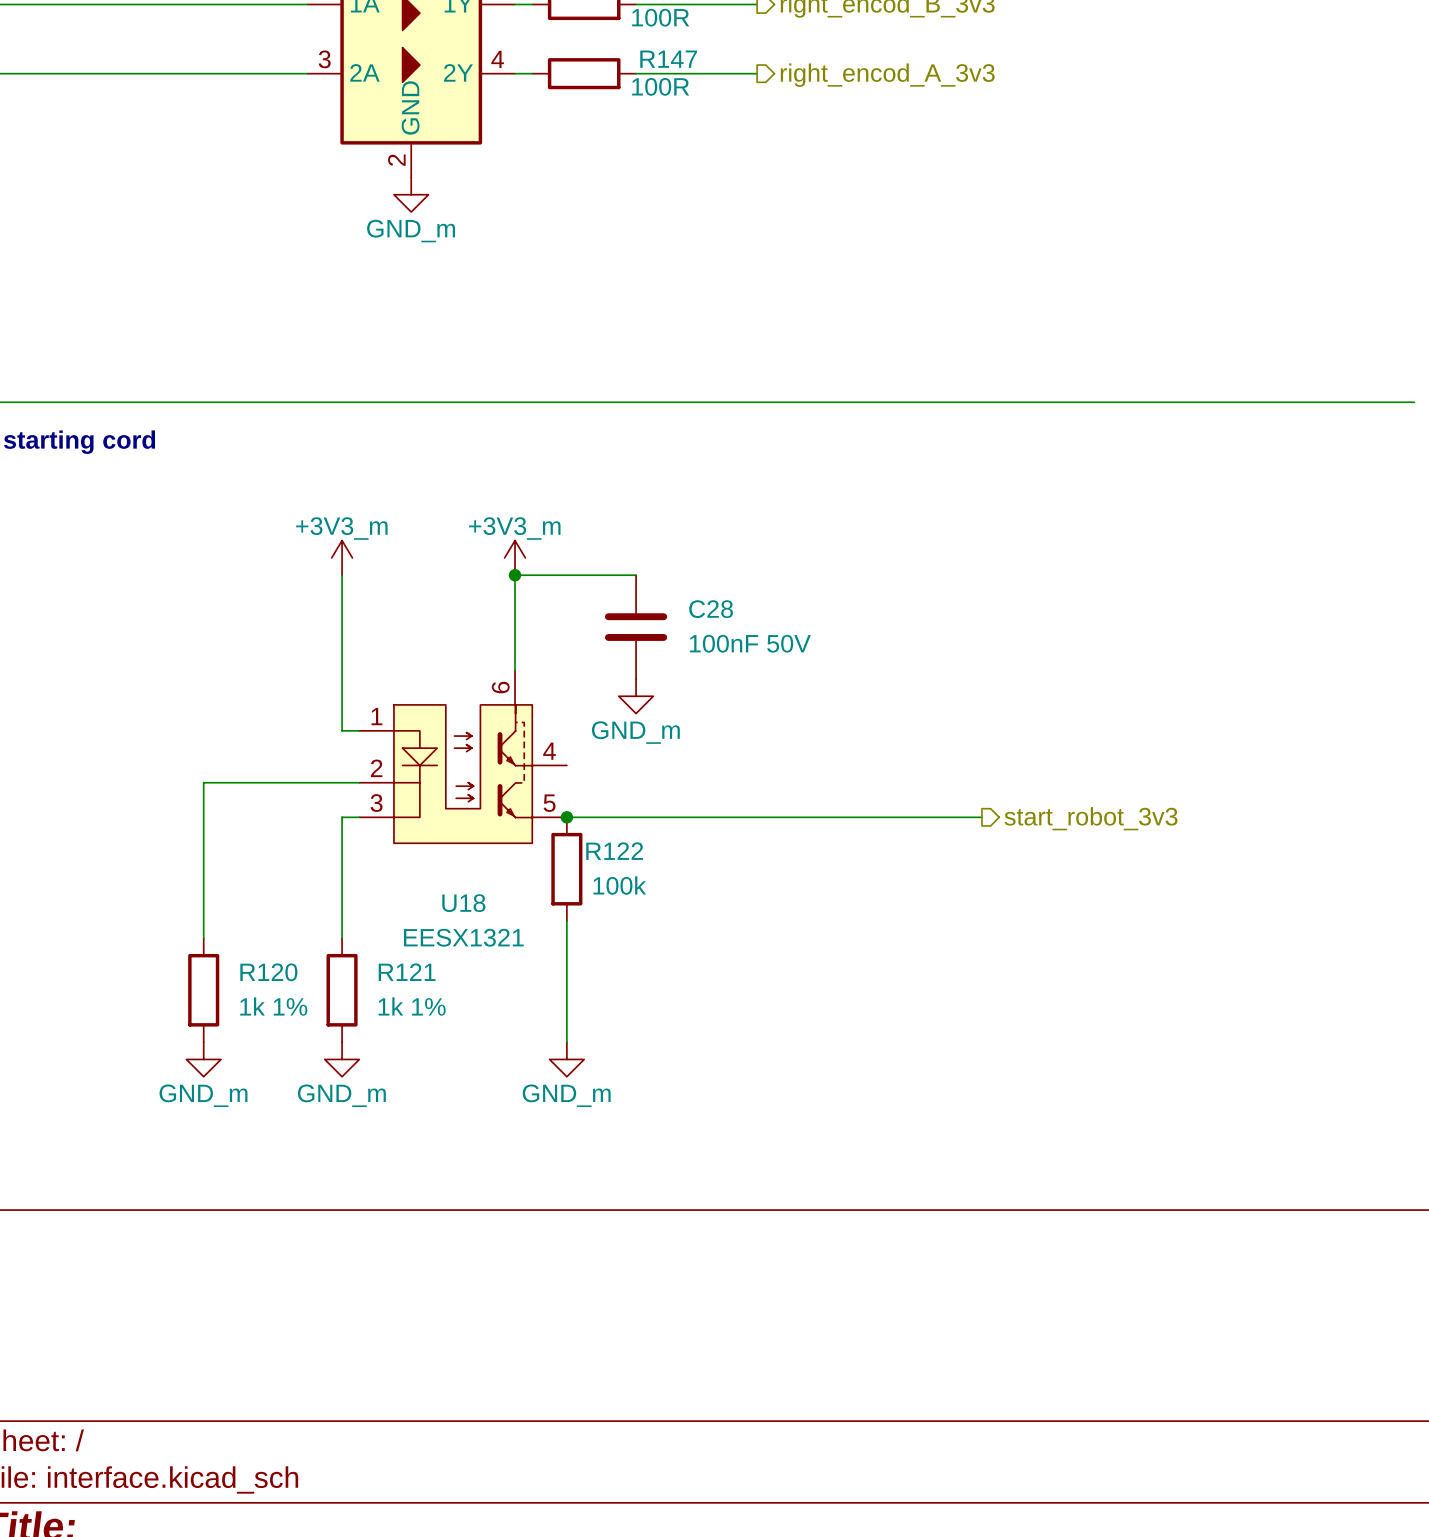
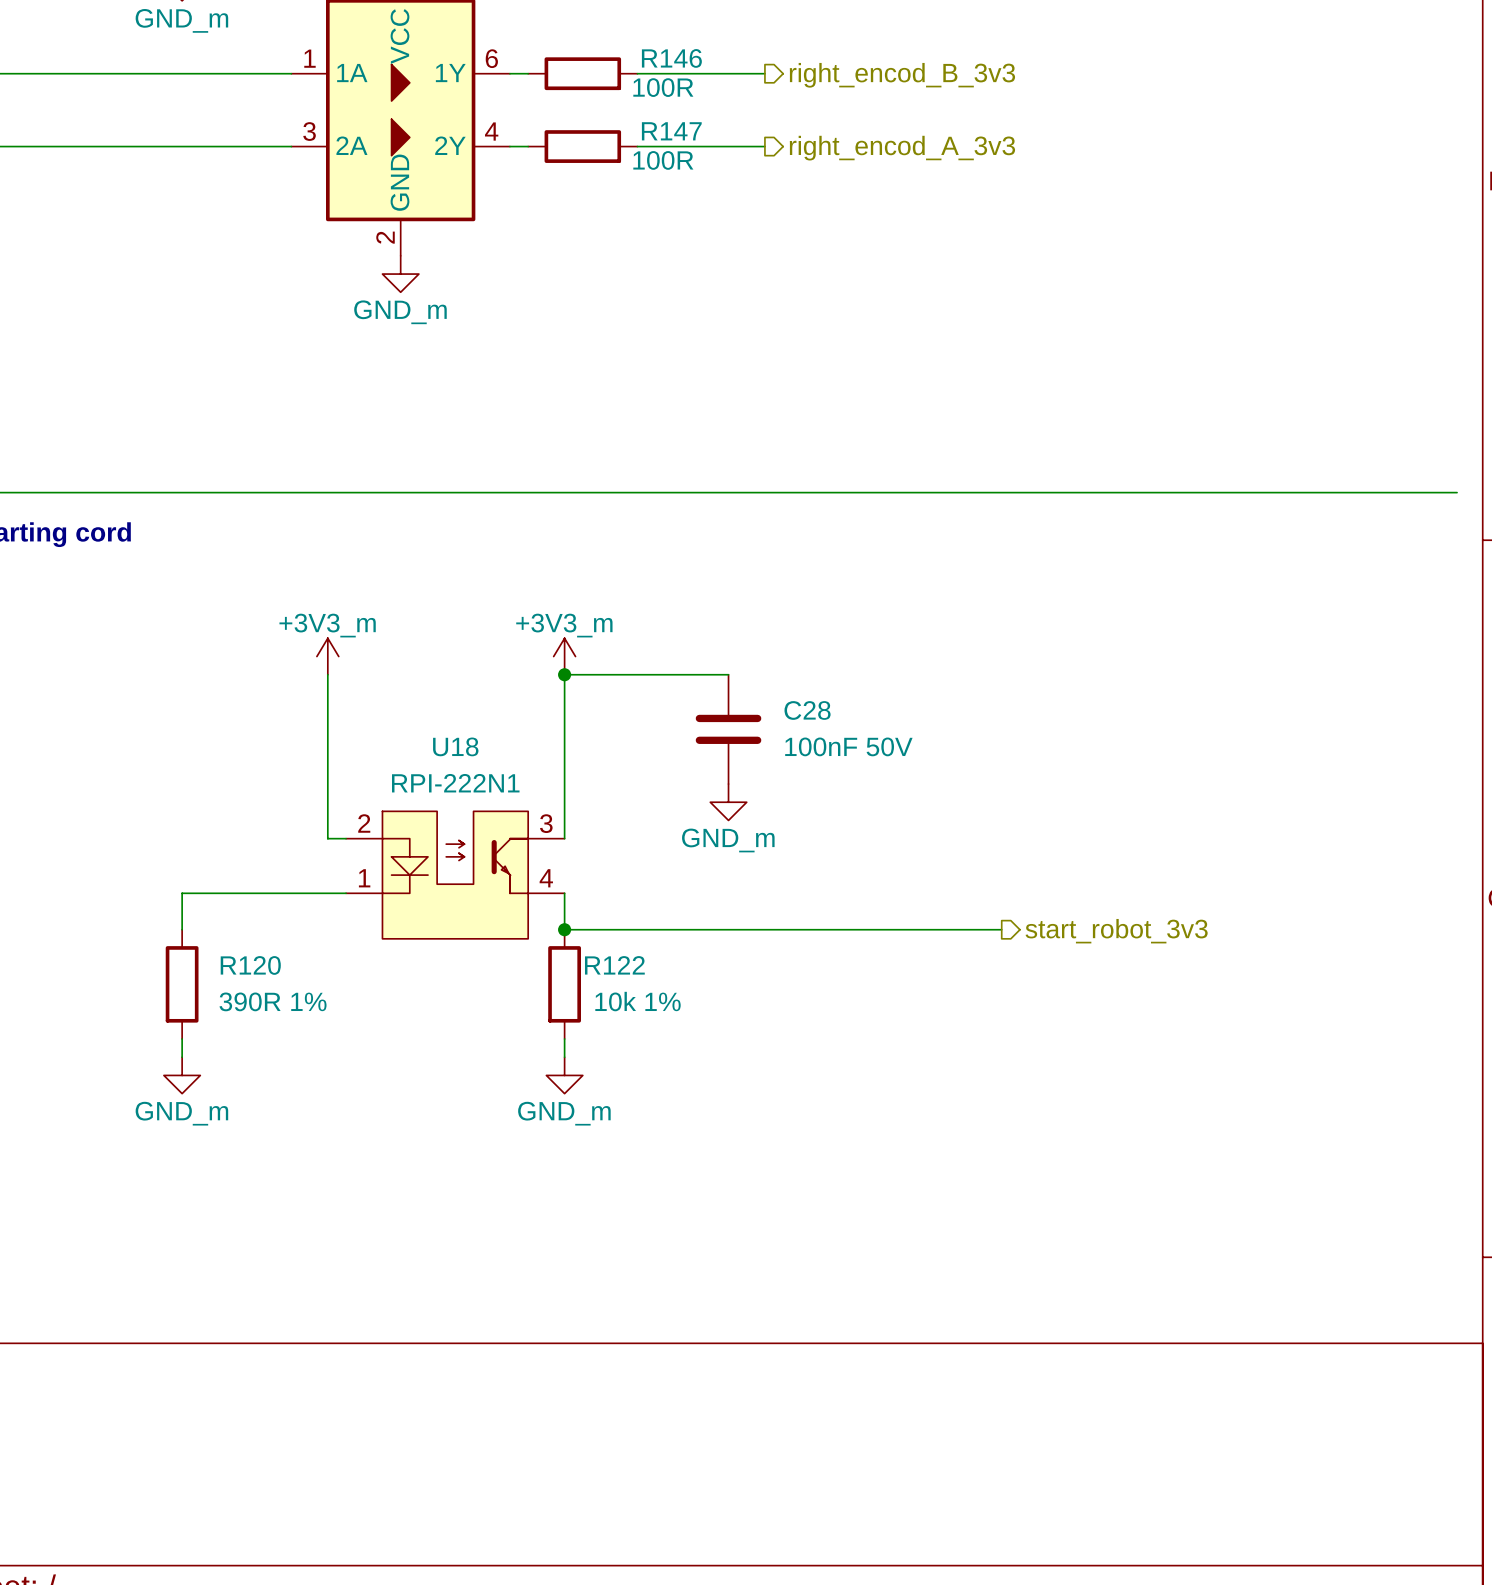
power symbol position: +3V3_m (515, 557) -> +3V3_m (564, 656)
junction position: (515, 575) -> (564, 674)
wire: (566, 575) (515, 575) (515, 670) -> (564, 674) (564, 838)
wire: none -> (637, 674) (728, 674)
C28 position: (636, 627) -> (728, 729)
U18 symbol: [359, 670, 567, 844] -> [346, 811, 565, 939]
power symbol position: GND_m (636, 696) -> GND_m (728, 802)
wire: none -> (564, 893) (564, 929)
wire: (203, 817) (203, 921) -> none
wire: (359, 817) (342, 817) (342, 938) -> none
R122 value: 100k (619, 885) -> 10k 1% (637, 1001)
U18 name position: U18 (463, 903) -> U18 (455, 746)
U18 value: EESX1321 (463, 937) -> RPI-222N1 (455, 783)
wire: (566, 938) (566, 1042) -> none
power symbol: none -> GND_m (182, 1075)
R120 position: (203, 990) -> (182, 984)
R121: 1k 1% (342, 990) -> none
R120 value: 1k 1% (273, 1006) -> 390R 1% (273, 1001)
power symbol: GND_m (203, 1059) -> none
power symbol: GND_m (342, 1059) -> none
power symbol position: GND_m (566, 1059) -> GND_m (564, 1075)

